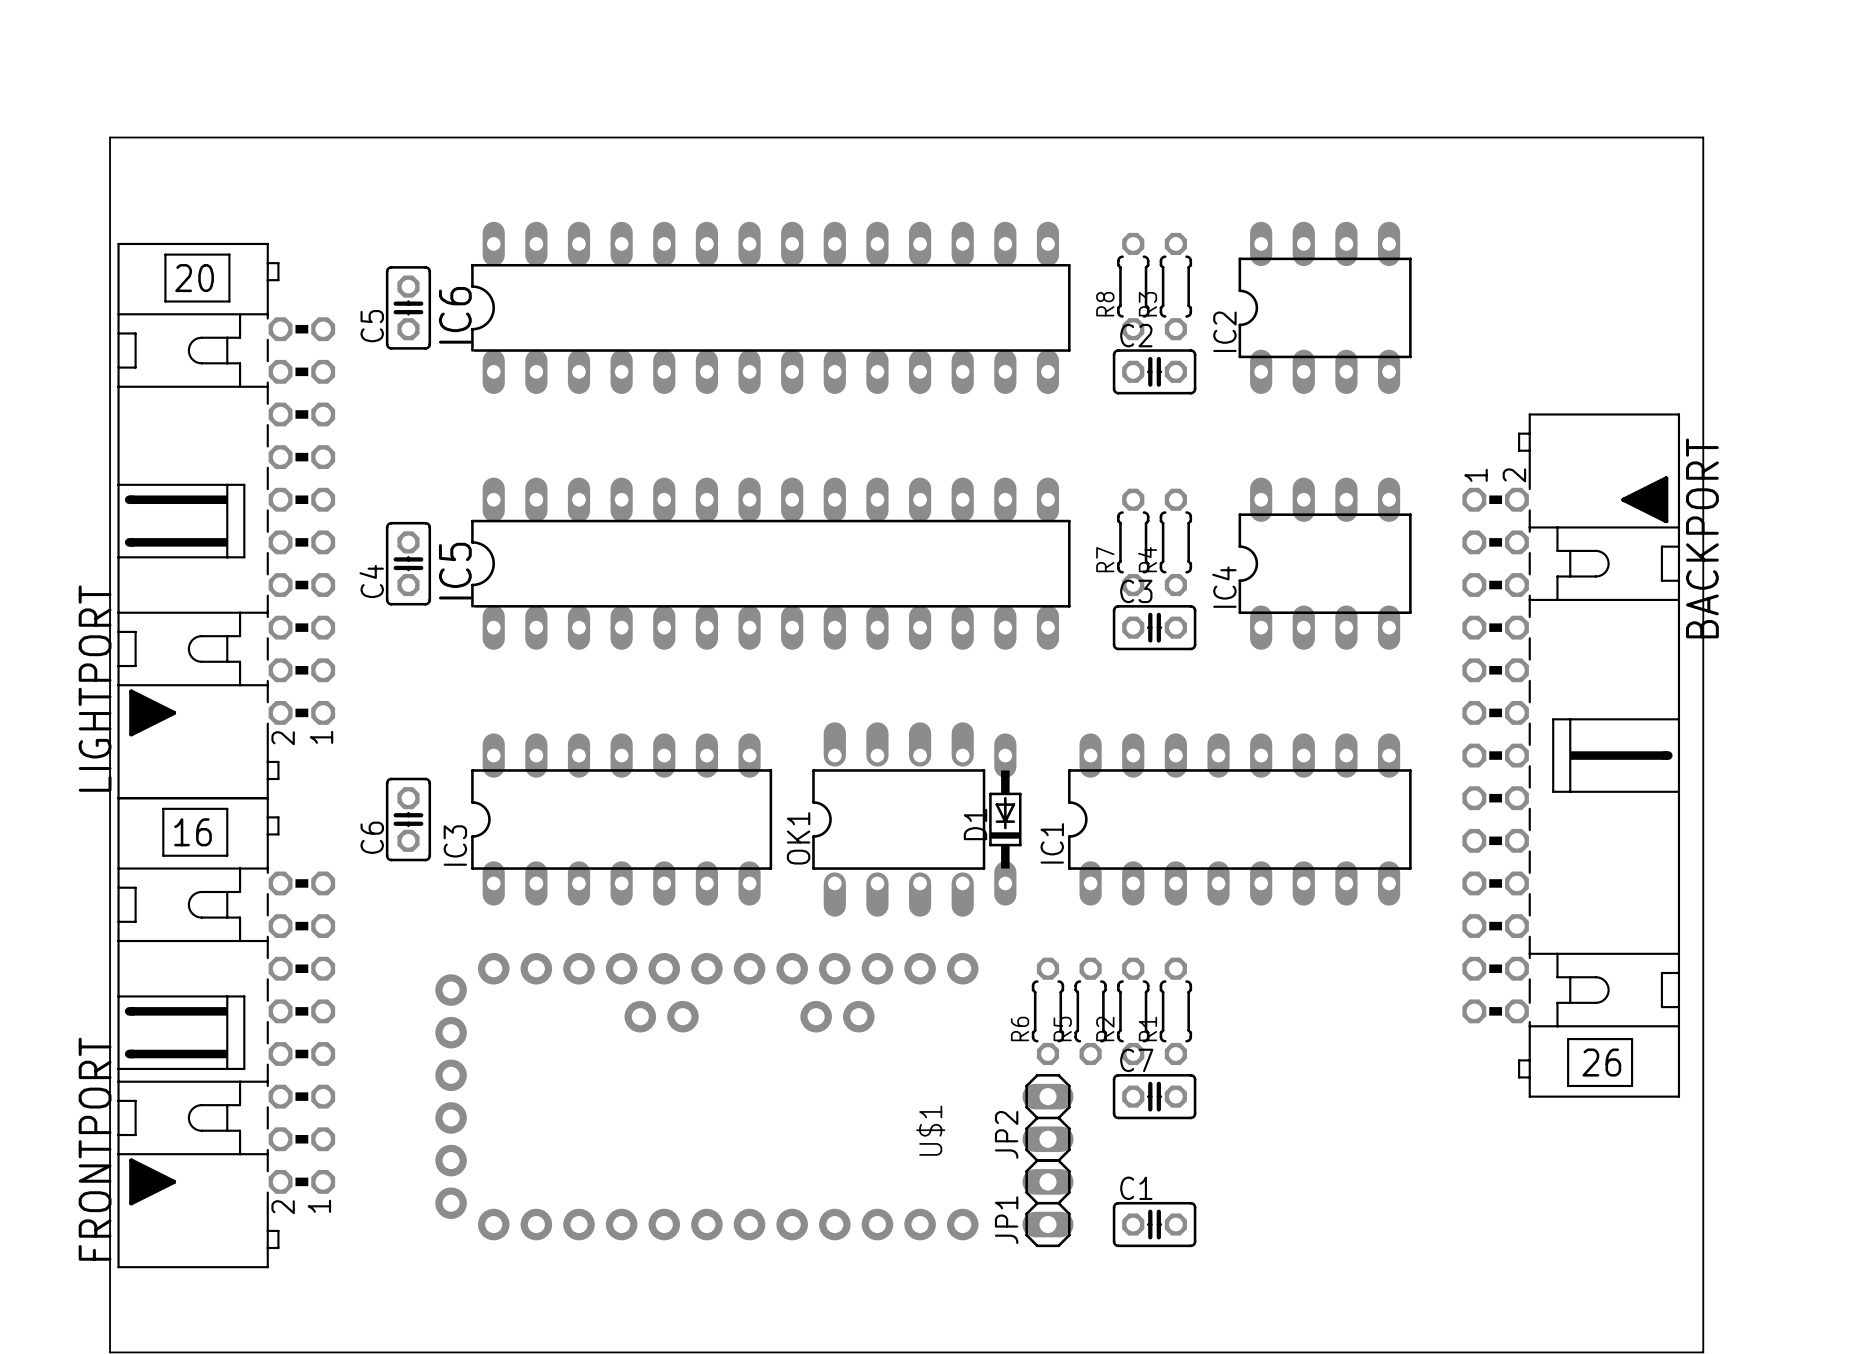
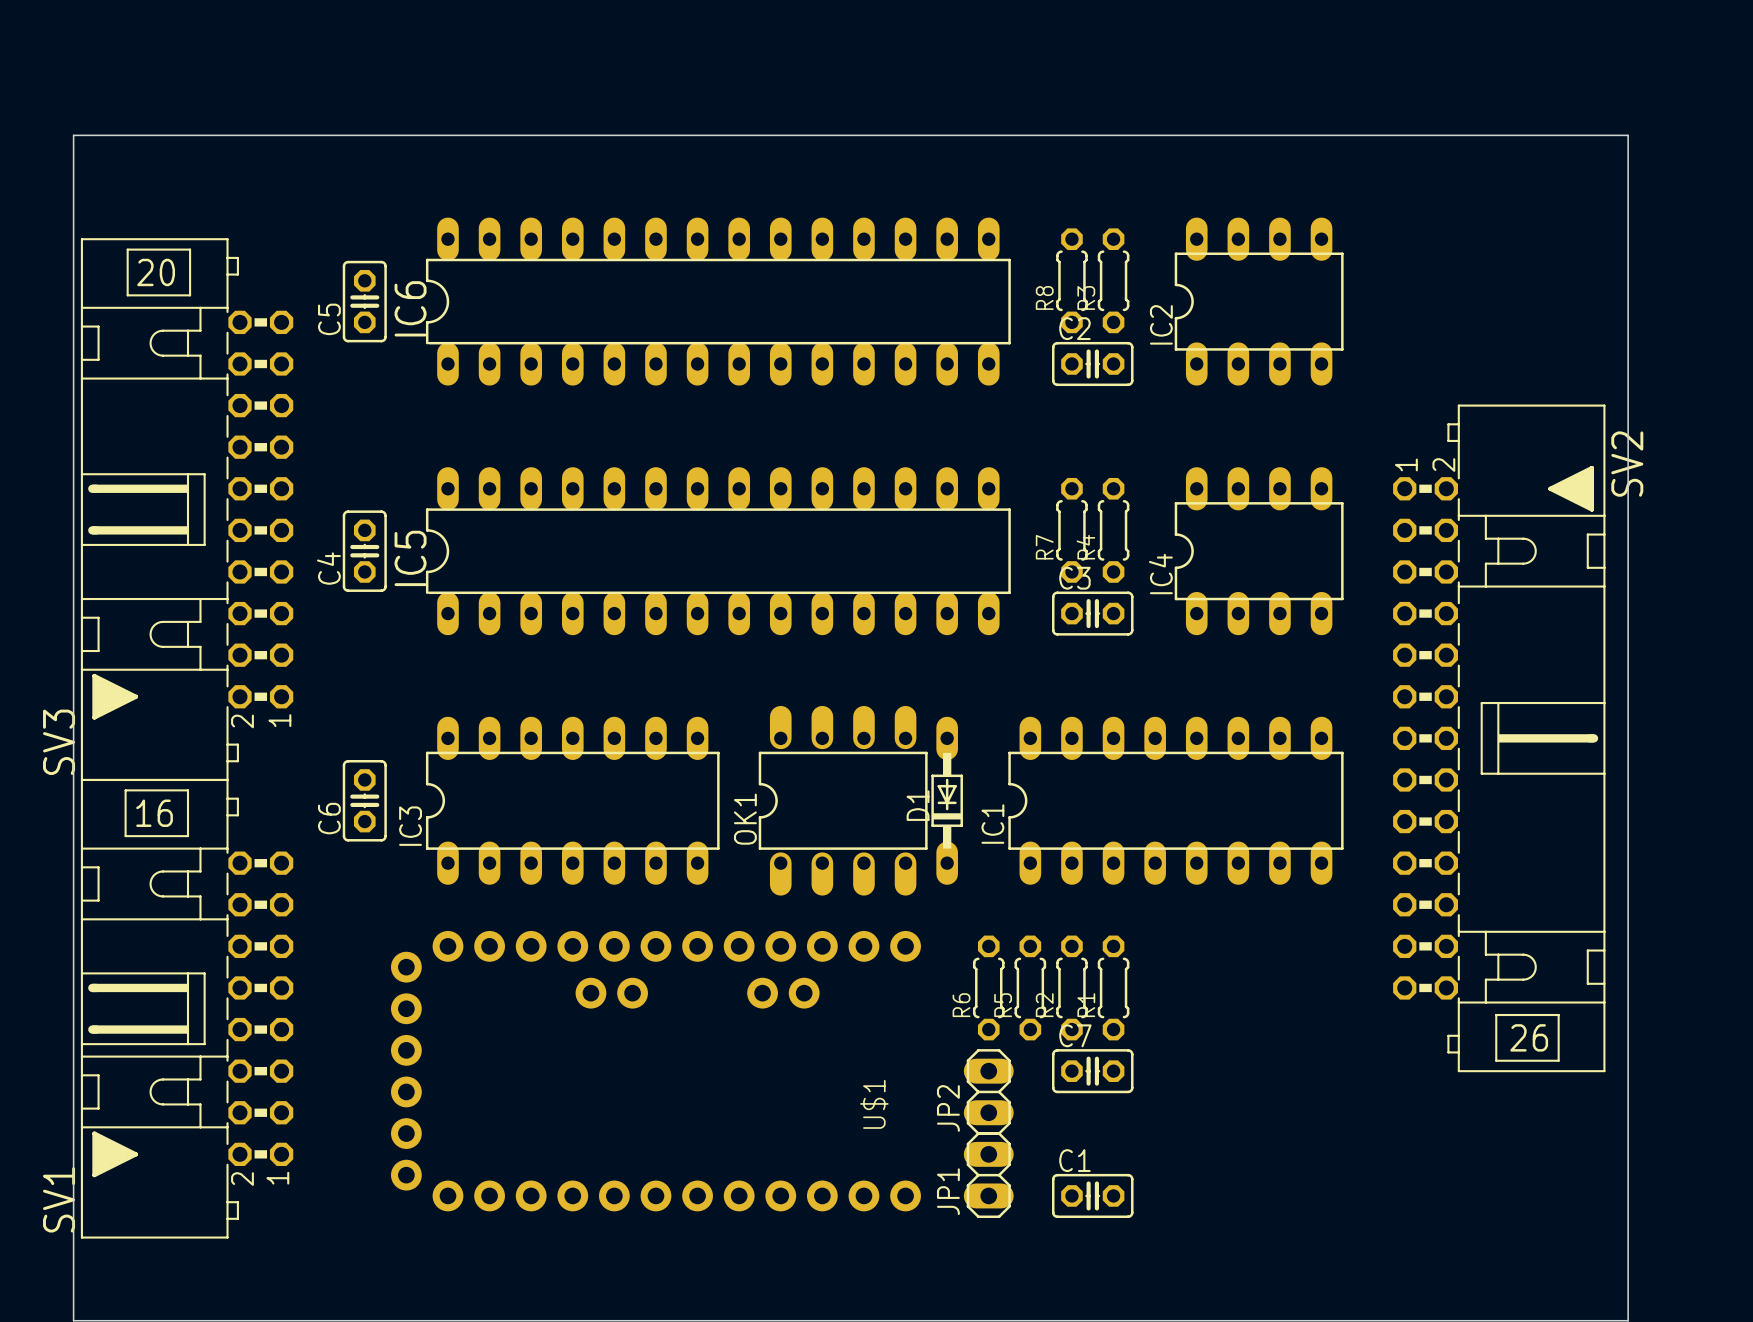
BACKPORT name: BACKPORT (1702, 538) -> SV2 (1627, 464)
LIGHTPORT name: LIGHTPORT (95, 688) -> SV3 (59, 742)
FRONTPORT name: FRONTPORT (95, 1149) -> SV1 (59, 1199)

